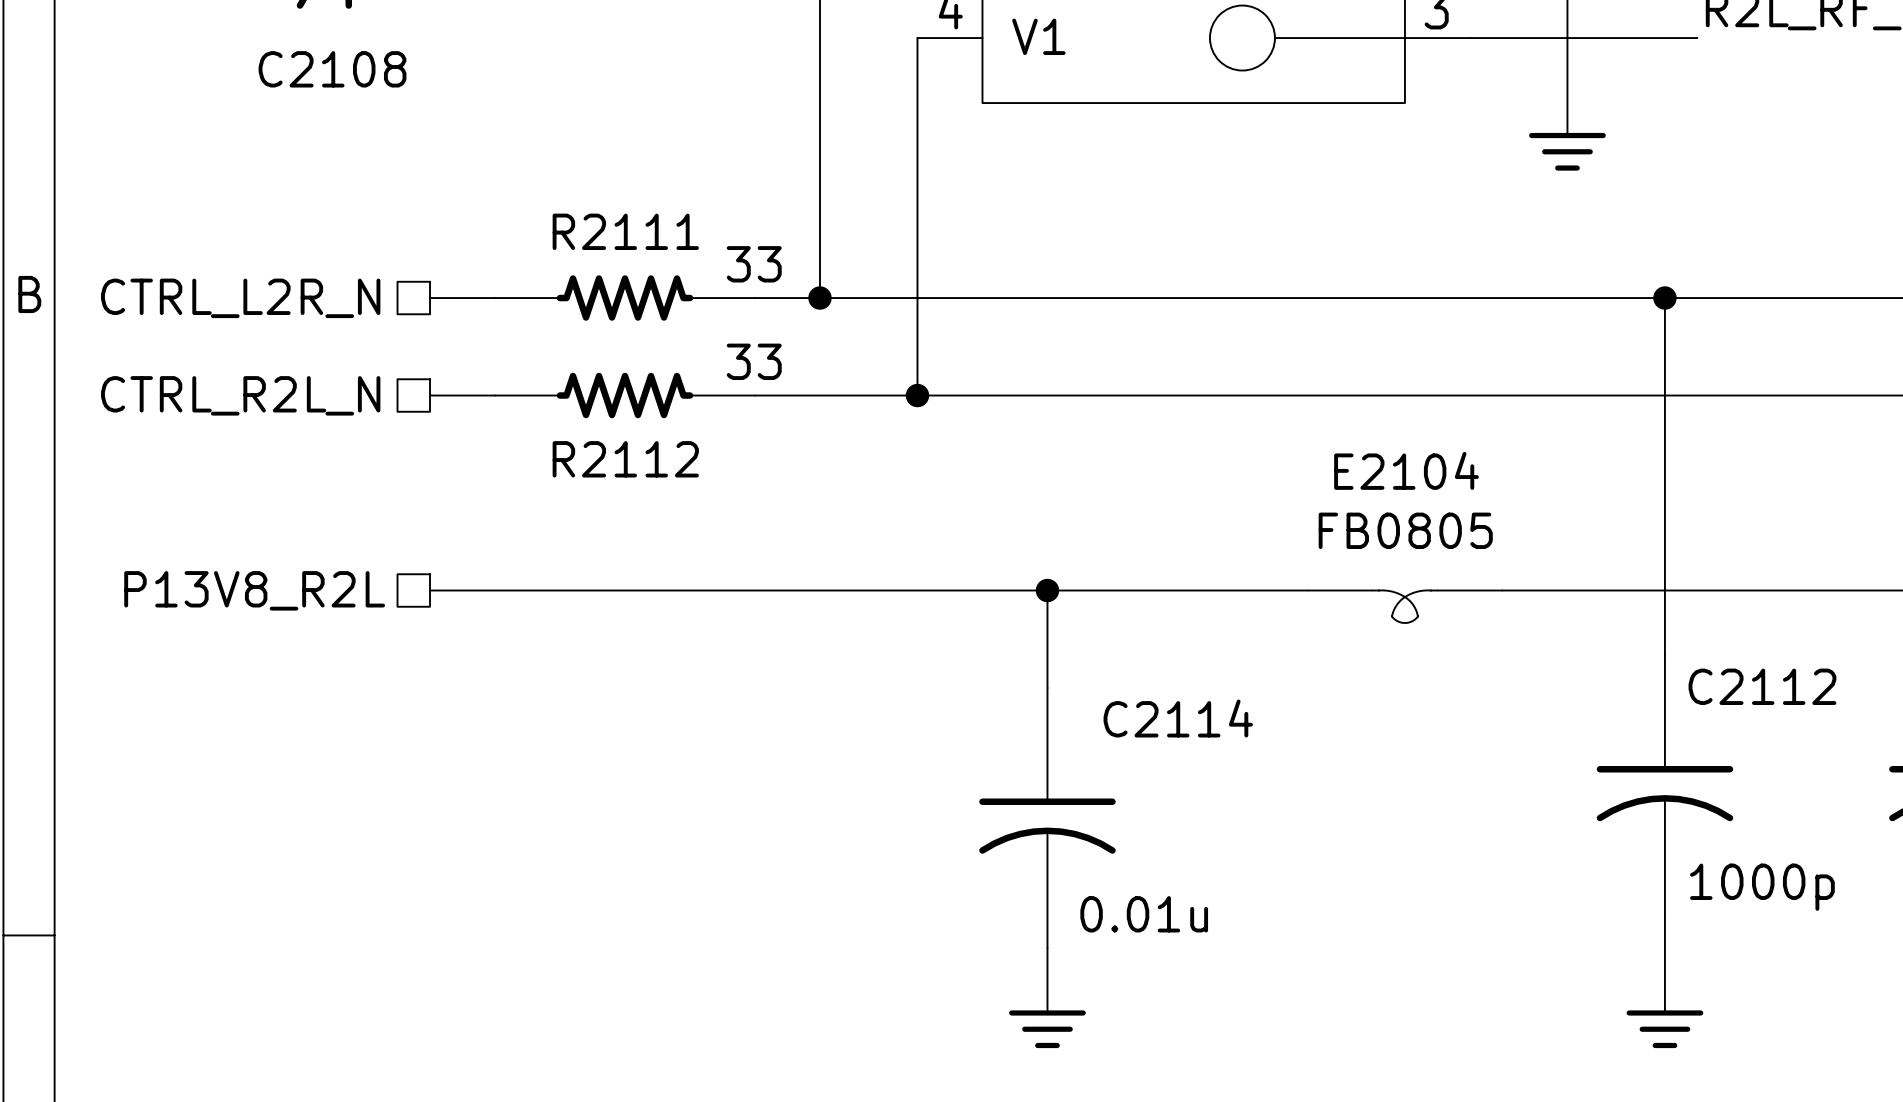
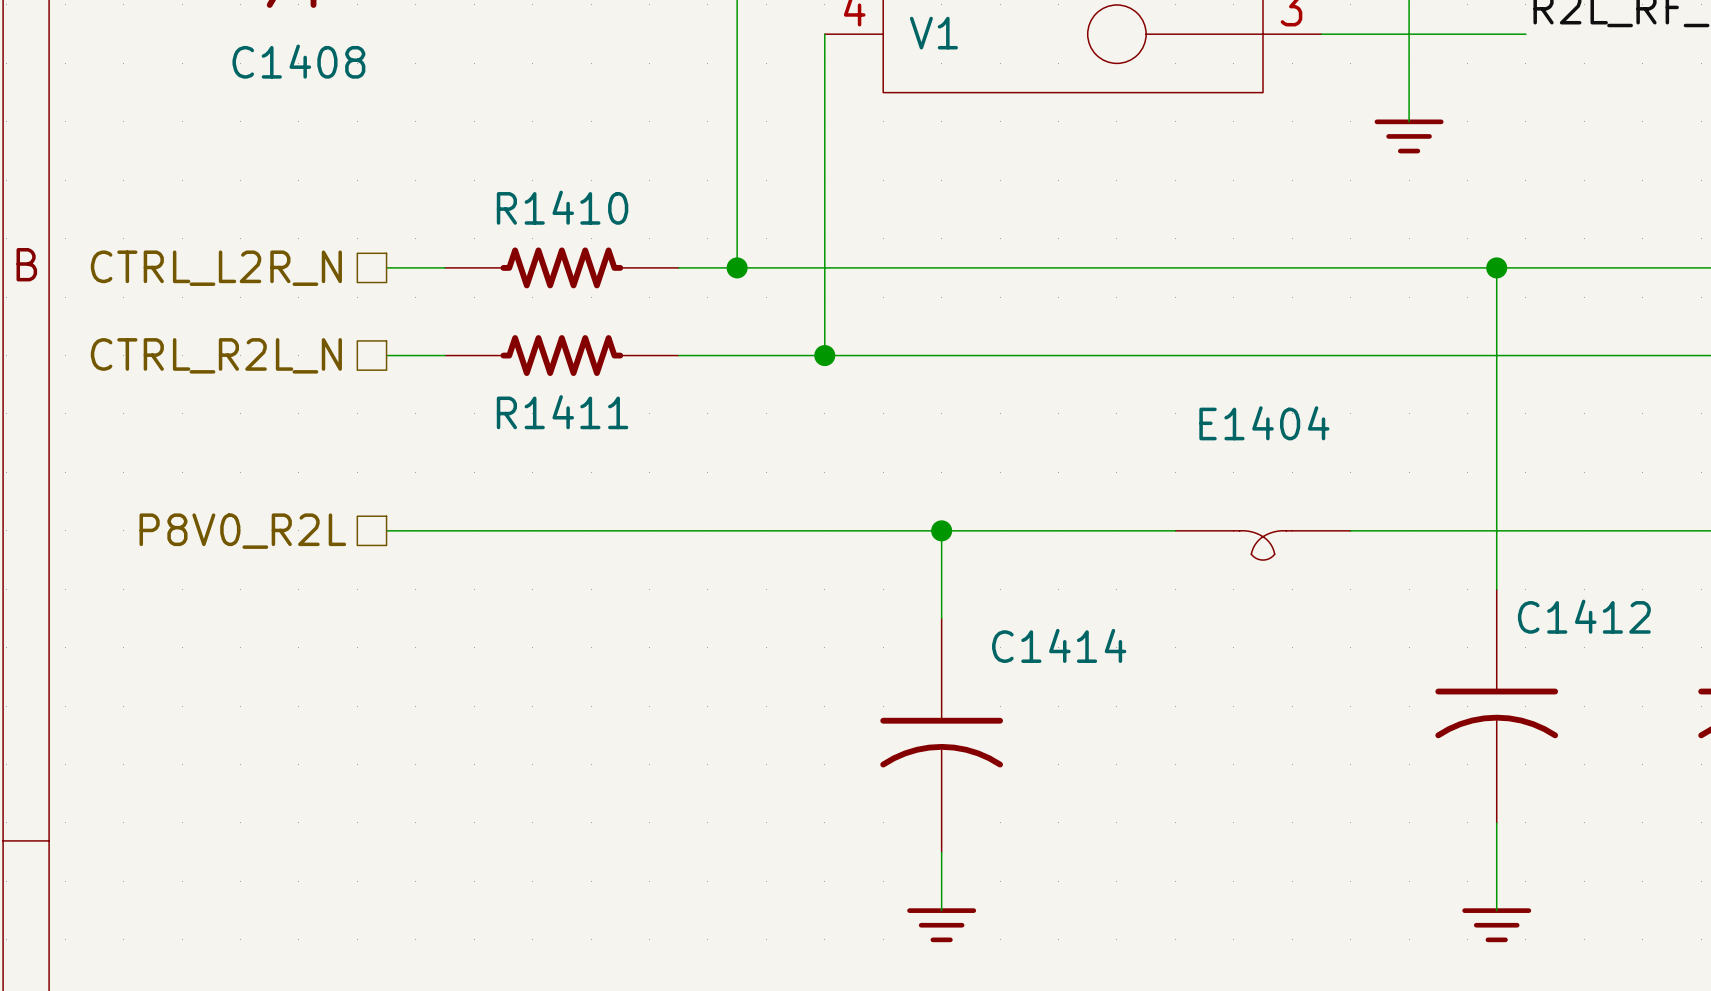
C2108 name: C2108 (332, 69) -> C1408 (298, 61)
R2111 name: R2111 (625, 231) -> R1410 (562, 207)
R2111 value: 33 (754, 264) -> none
R2112 value: 33 (754, 361) -> none
R2112 name: R2112 (625, 459) -> R1411 (562, 412)
E2104 name: E2104 (1406, 470) -> E1404 (1264, 423)
E2104 value: FB0805 (1405, 530) -> none
hierarchical label: P13V8_R2L (254, 590) -> P8V0_R2L (242, 531)
C2112 name: C2112 (1762, 686) -> C1412 (1584, 616)
C2114 name: C2114 (1178, 718) -> C1414 (1059, 645)
C2112 value: 1000p (1762, 887) -> none
C2114 value: 0.01u (1144, 914) -> none

